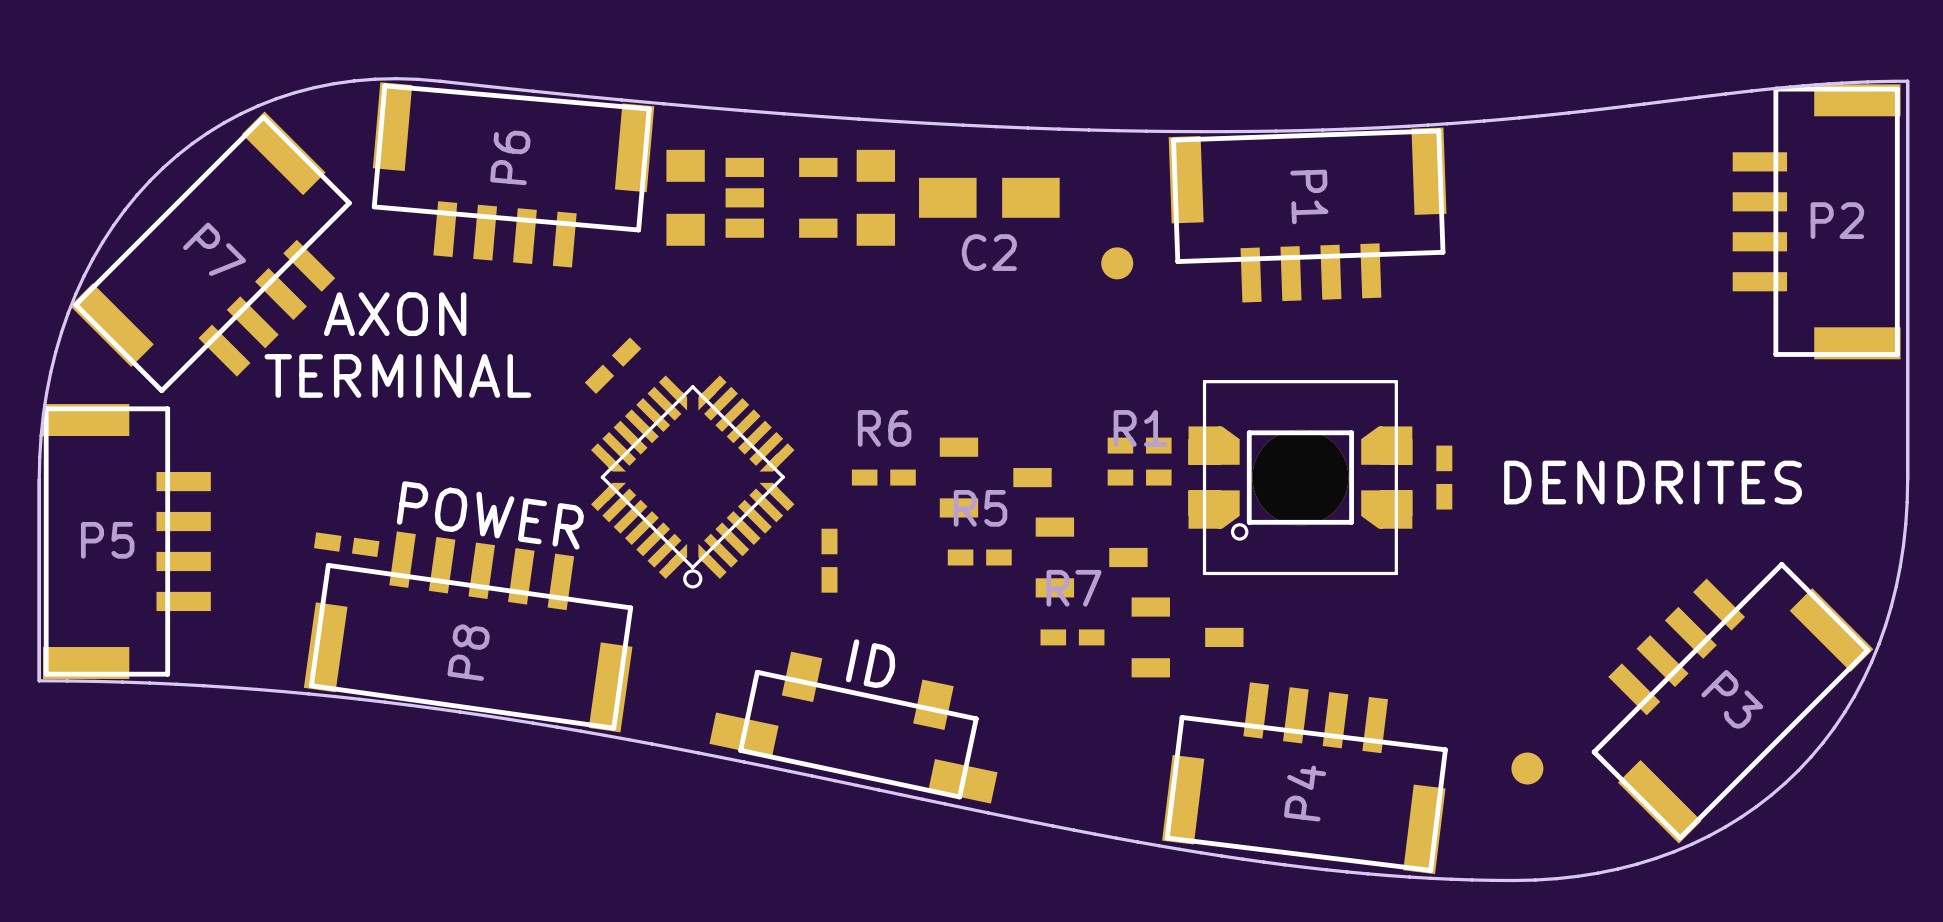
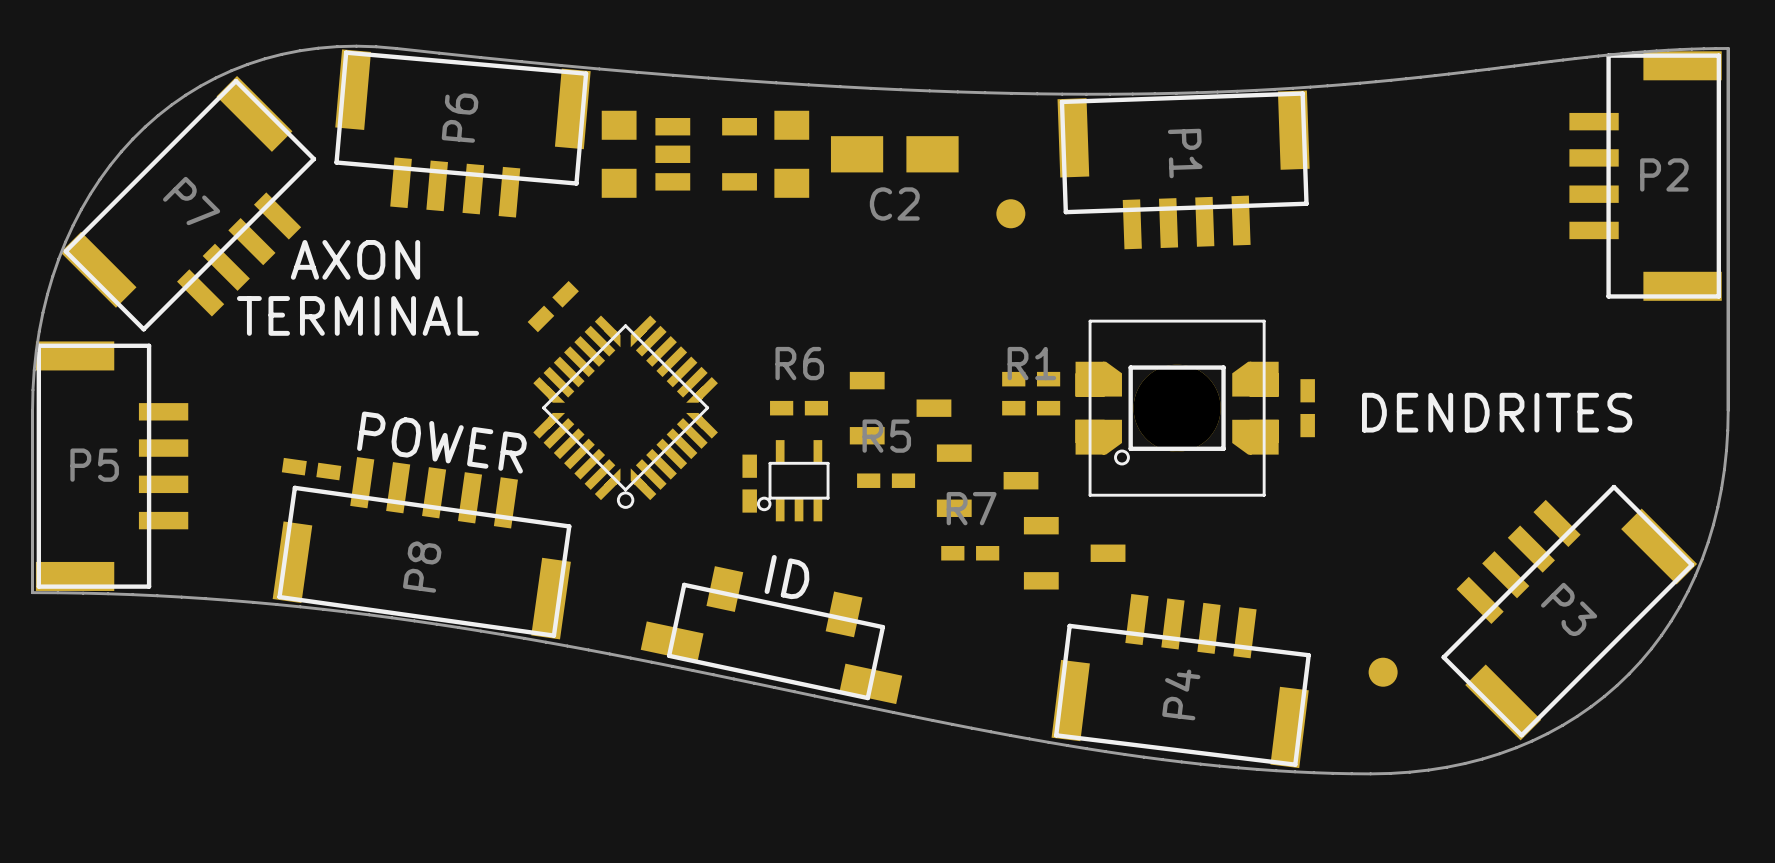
part: none -> (793, 480)

